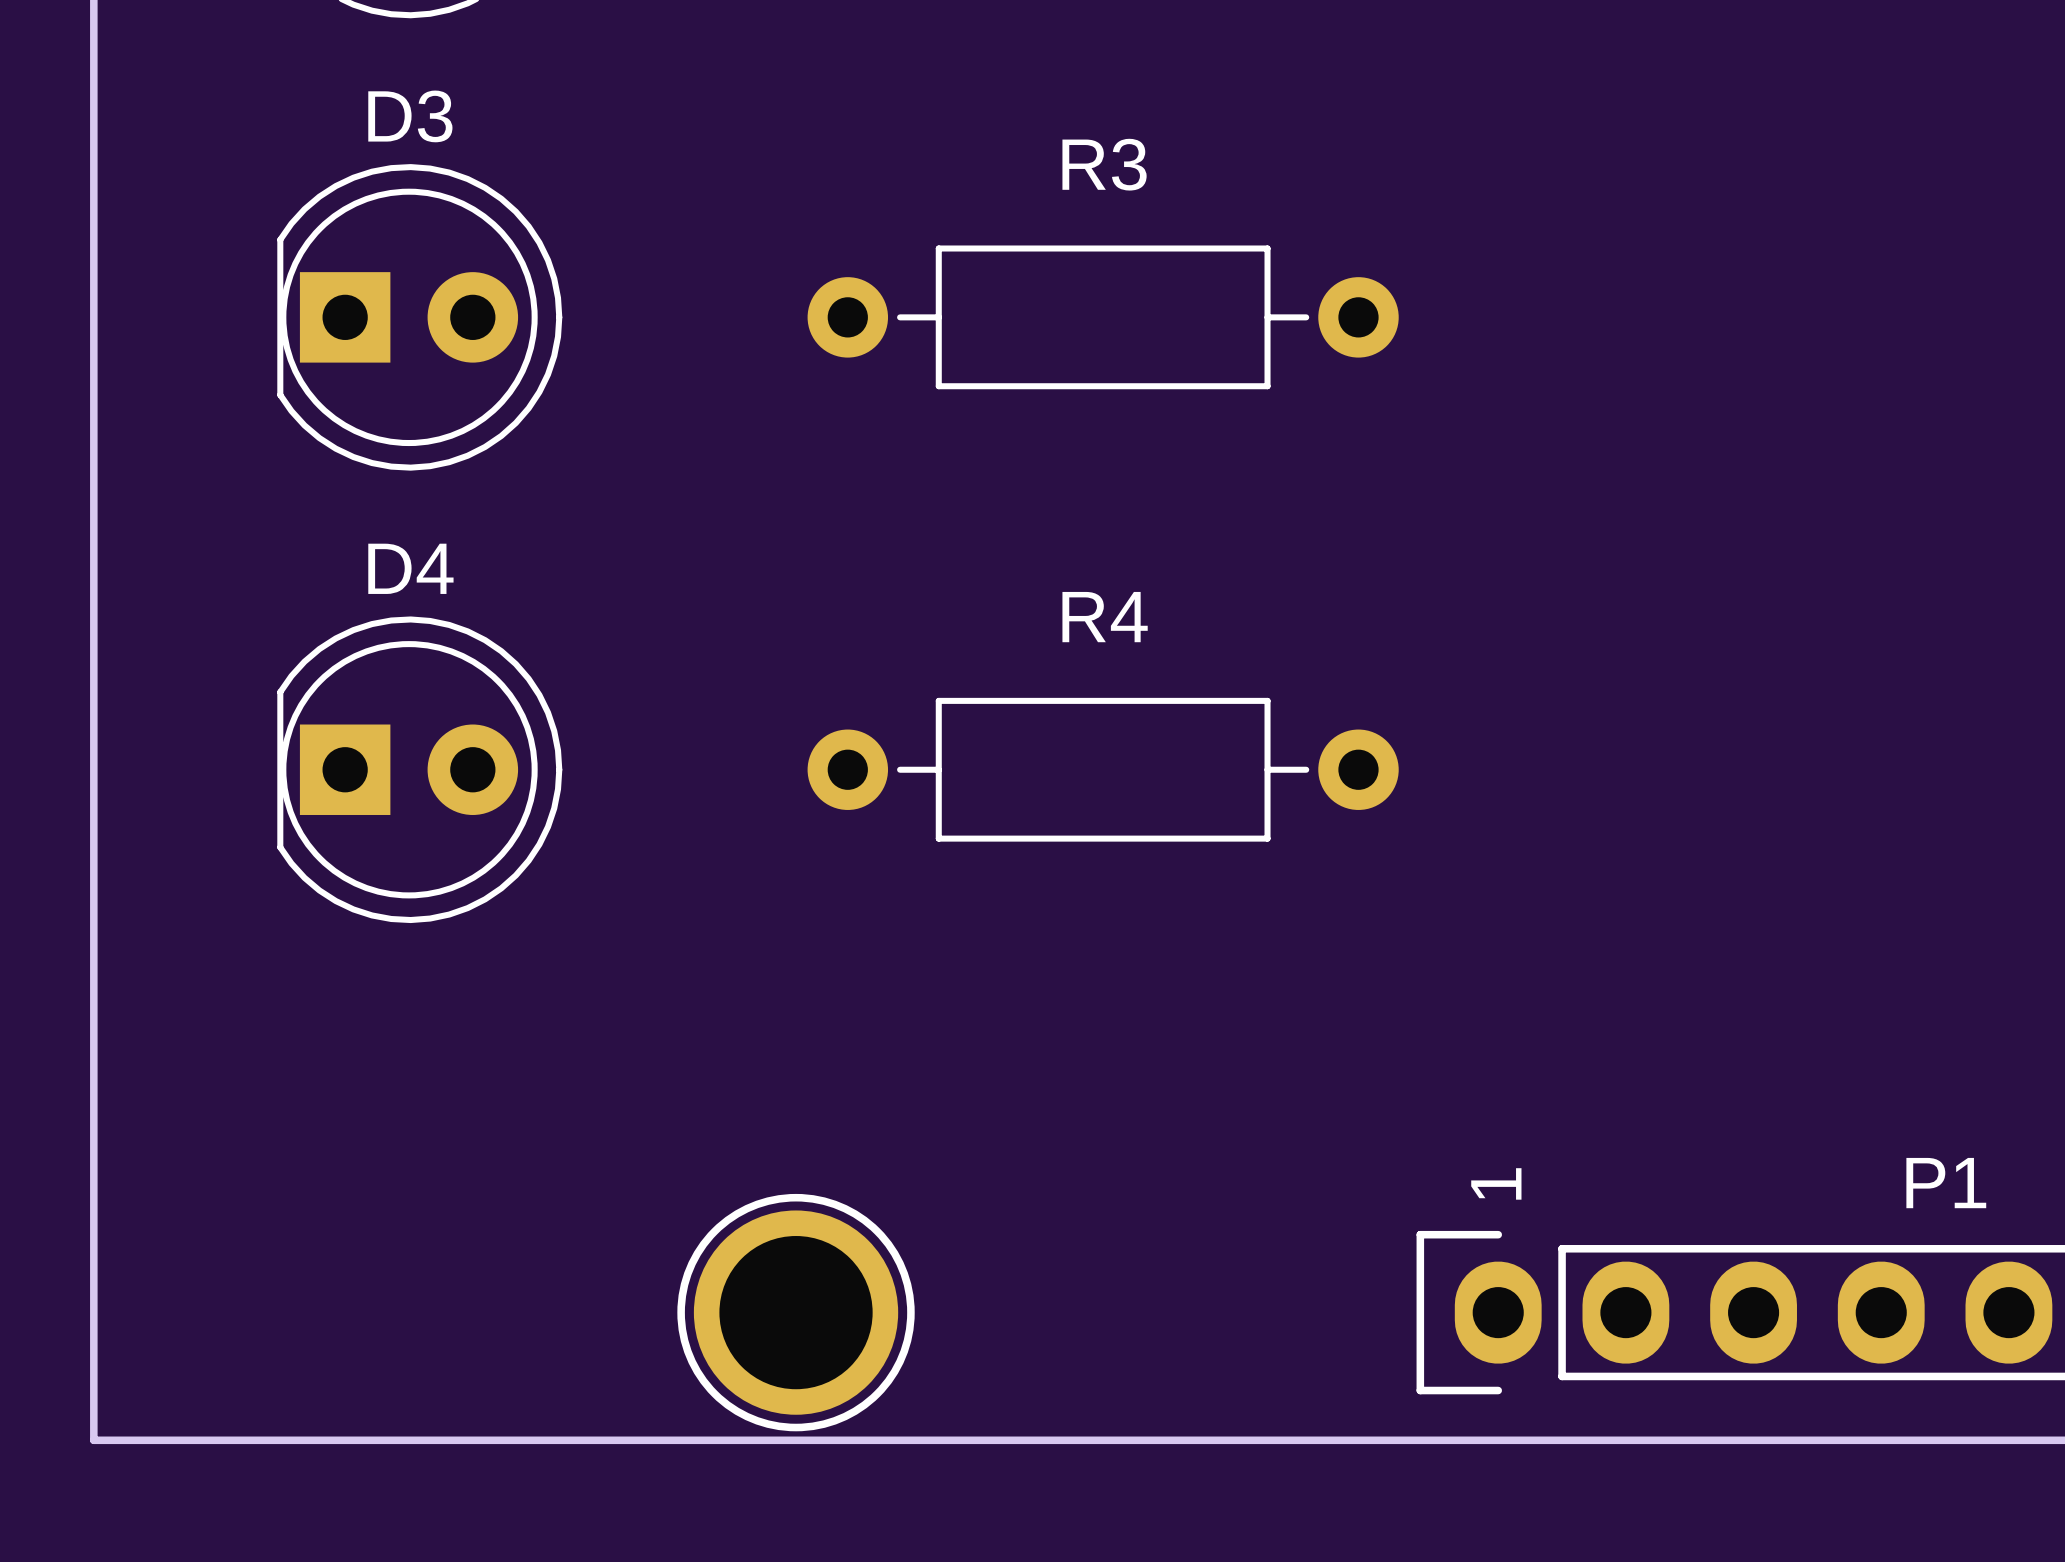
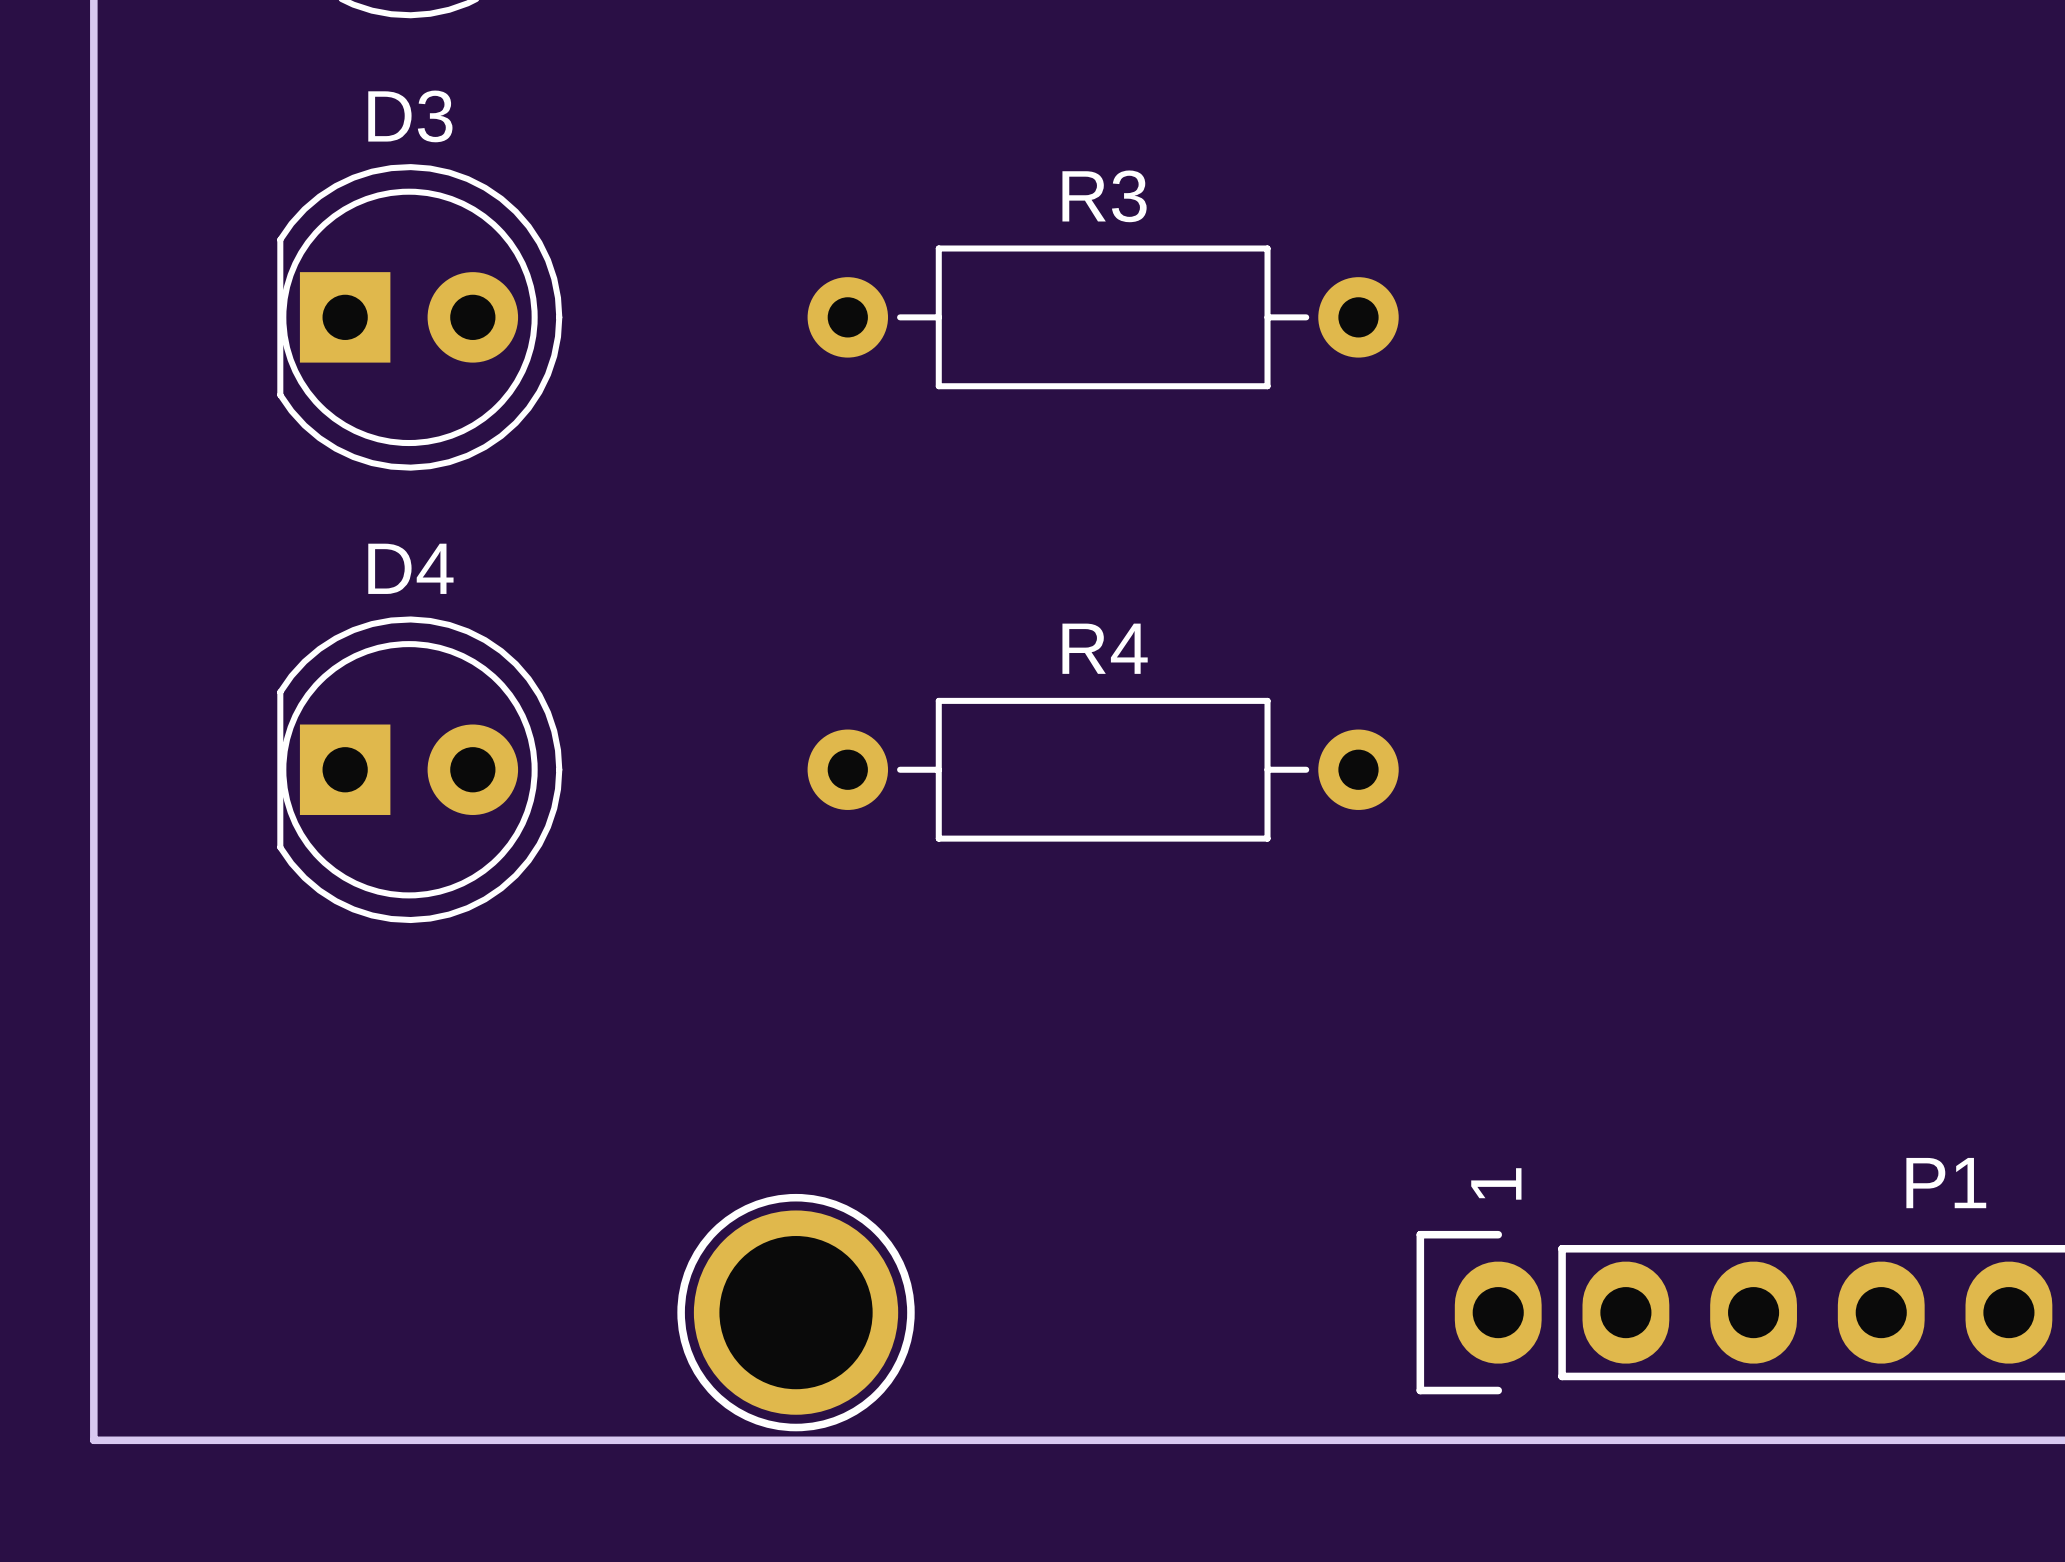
R3 name position: R3 (1104, 164) -> R3 (1104, 196)
R4 name position: R4 (1105, 617) -> R4 (1105, 648)

